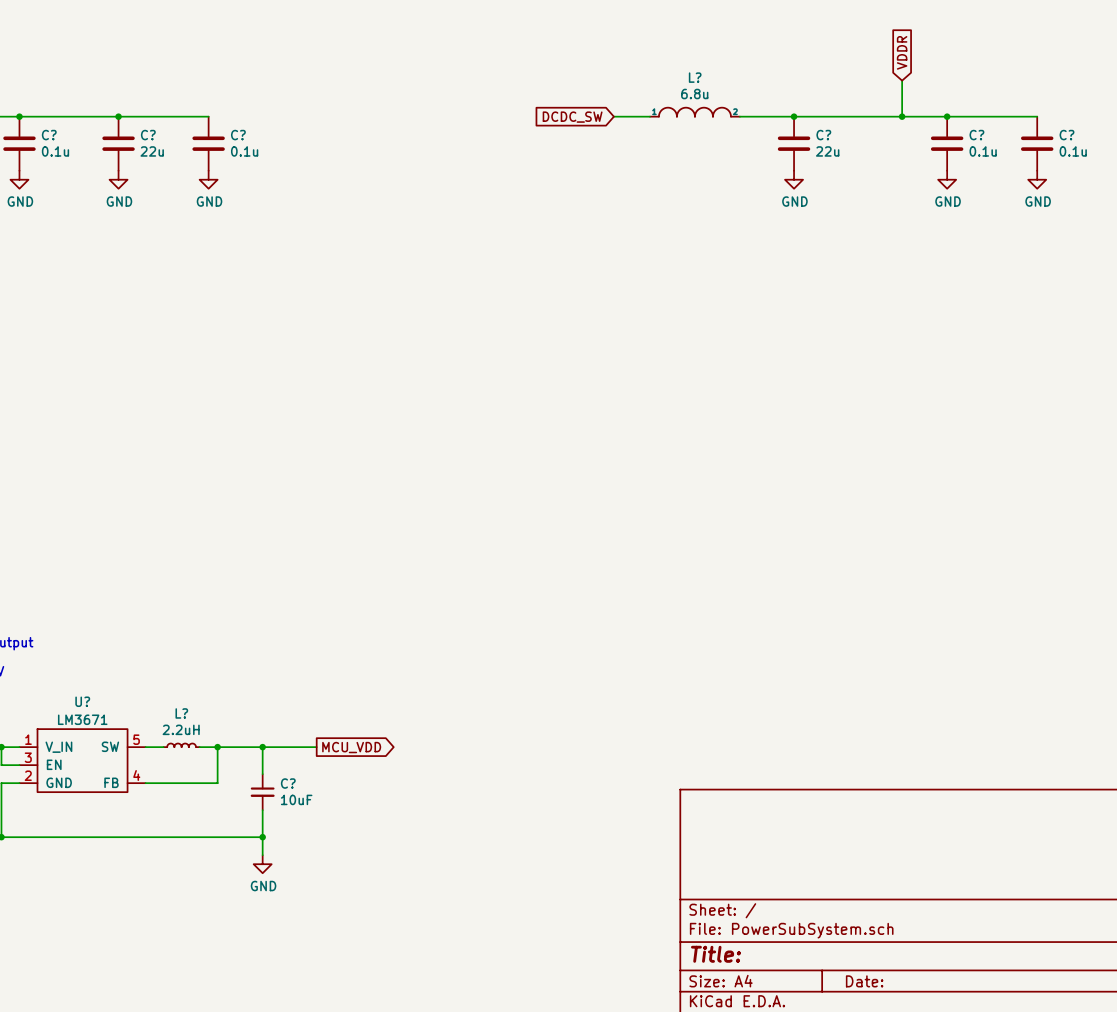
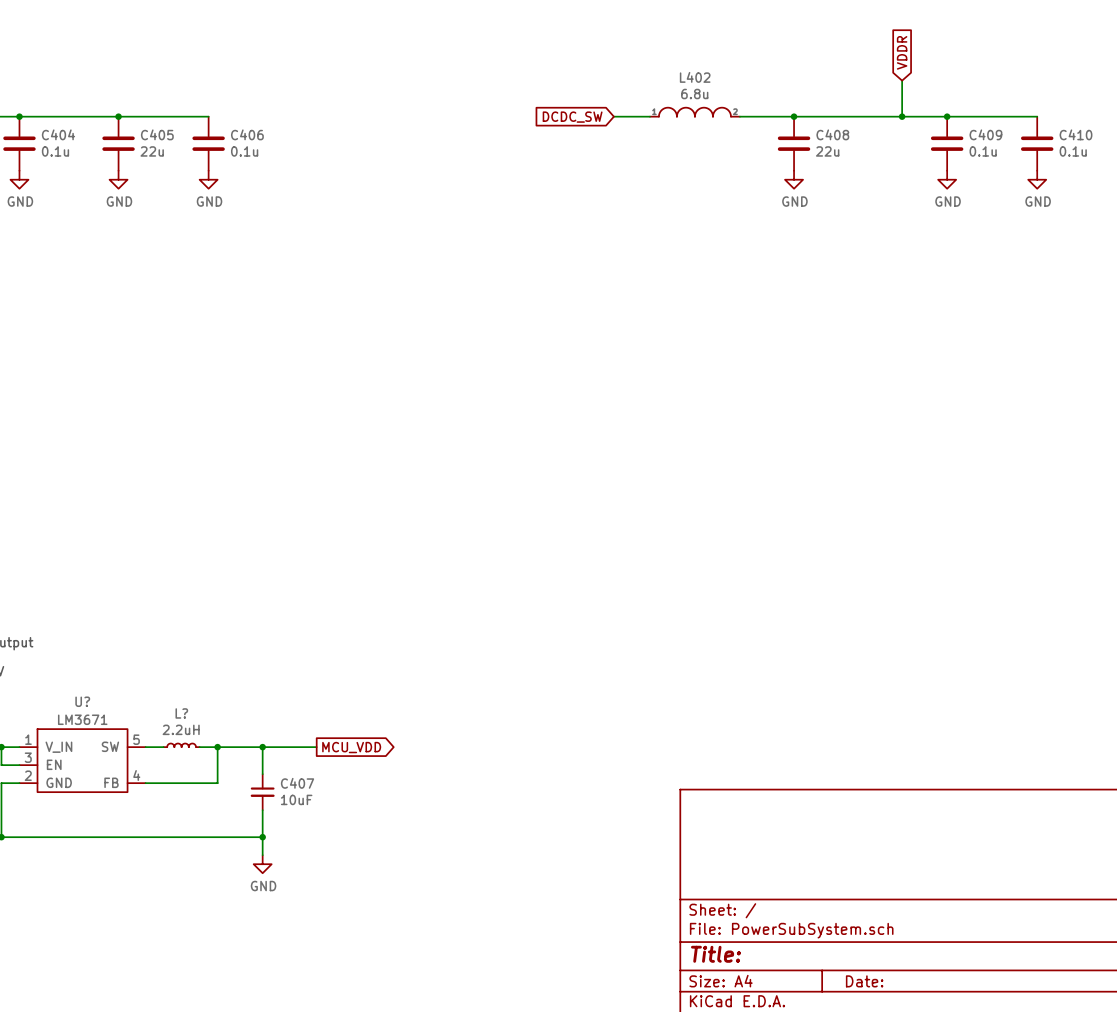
L? name: L? (695, 77) -> L402 (695, 77)
C? name: C? (49, 135) -> C404 (58, 134)
C? name: C? (148, 135) -> C405 (157, 134)
C? name: C? (238, 135) -> C406 (247, 134)
C? name: C? (823, 135) -> C408 (832, 134)
C? name: C? (976, 135) -> C409 (985, 134)
C? name: C? (1067, 135) -> C410 (1076, 134)
C? name: C? (288, 783) -> C407 (297, 783)

